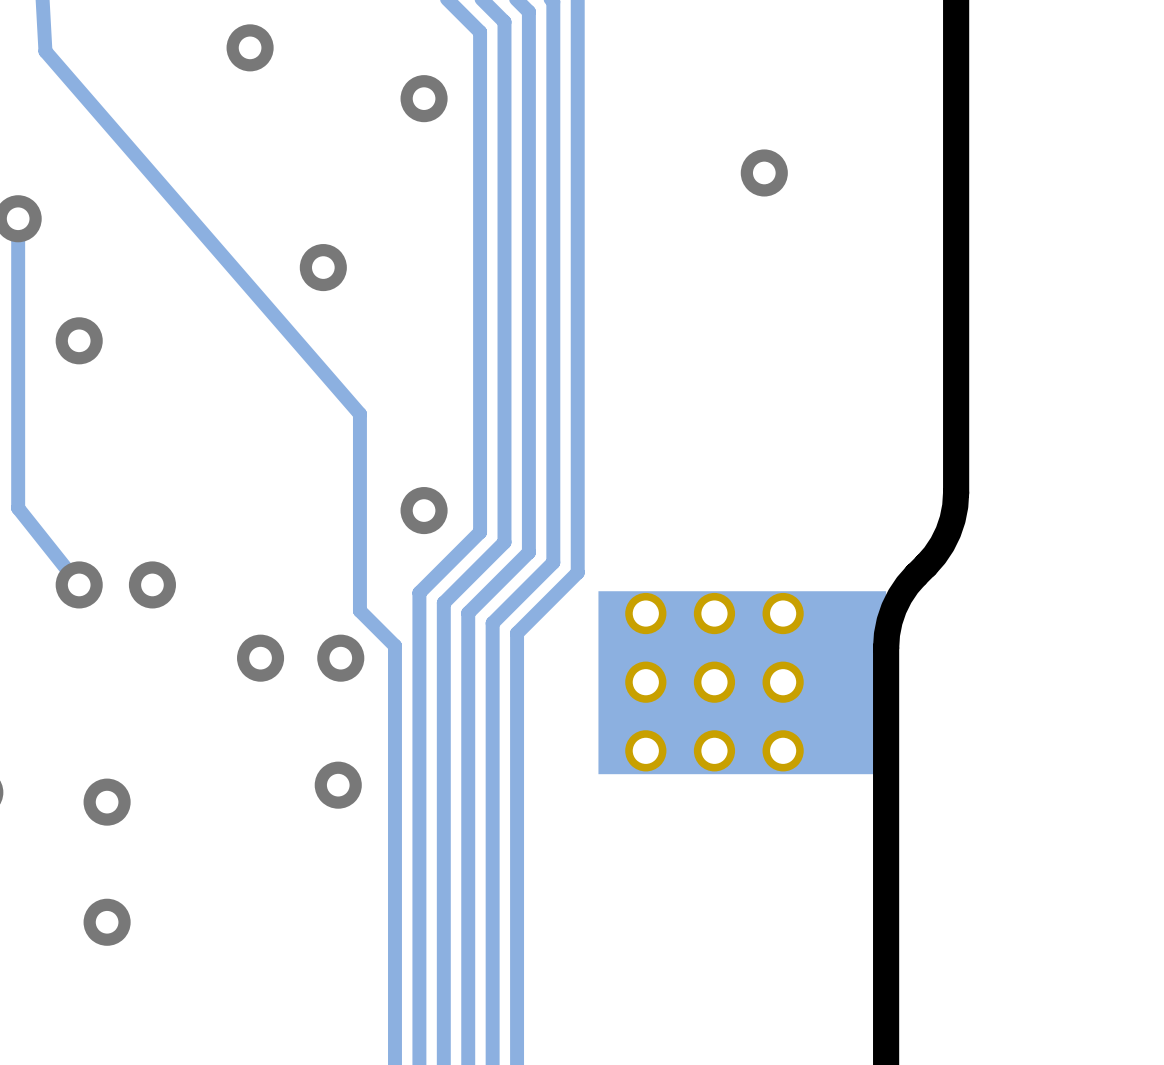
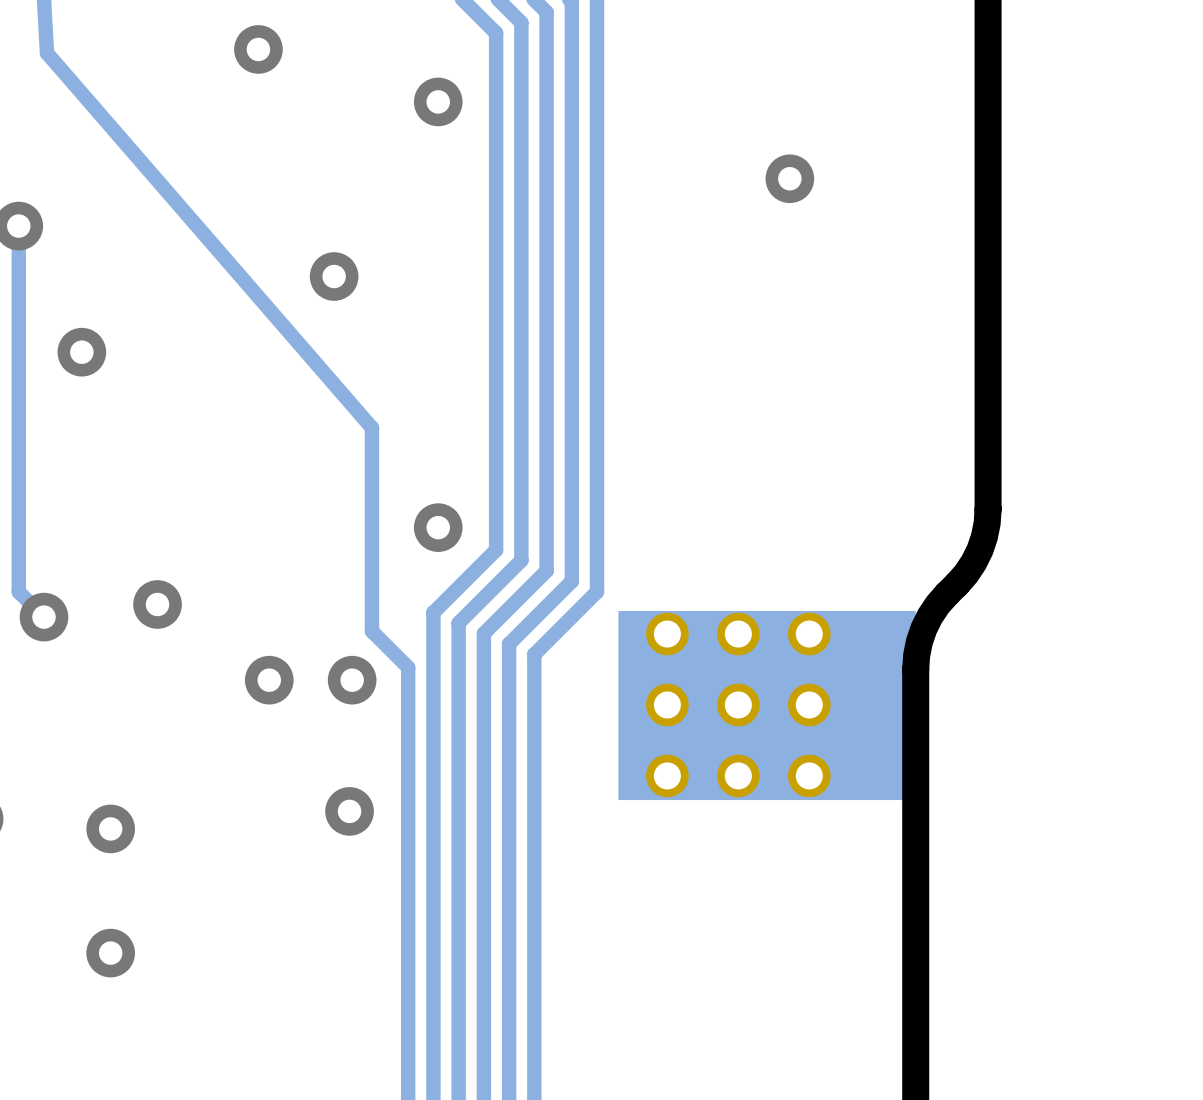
track: (18, 508) (79, 584) -> (18, 525) (18, 591) (44, 617)
via position: (79, 584) -> (44, 617)

